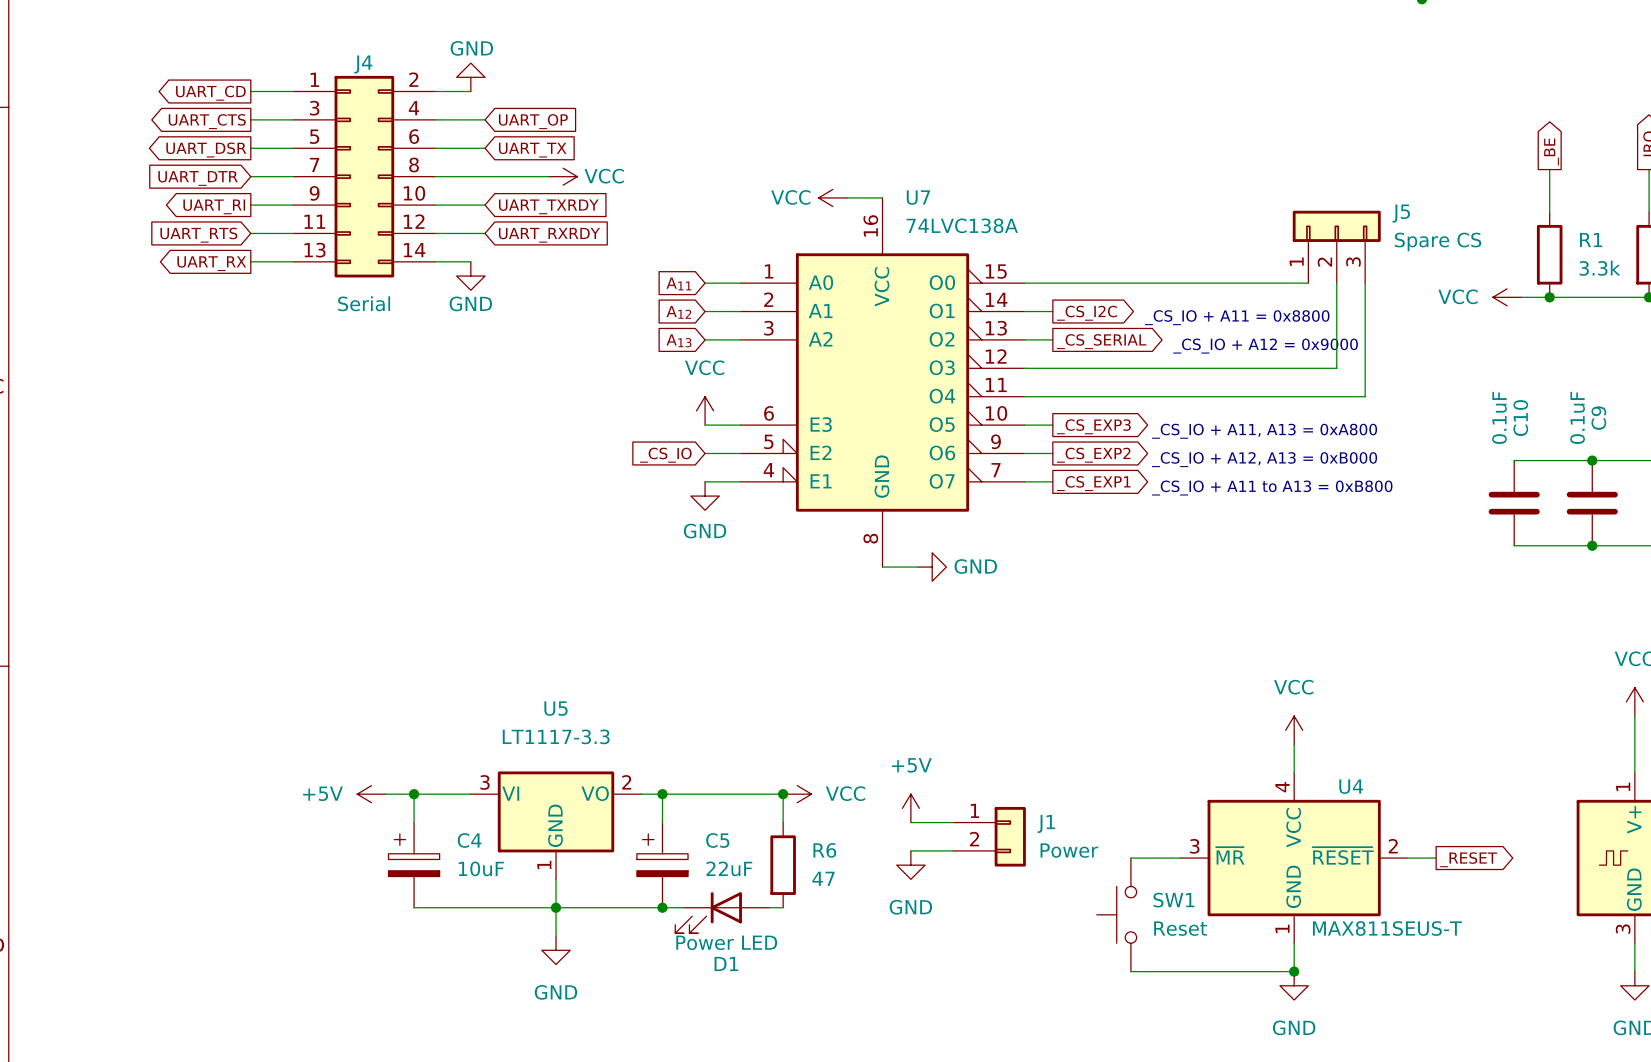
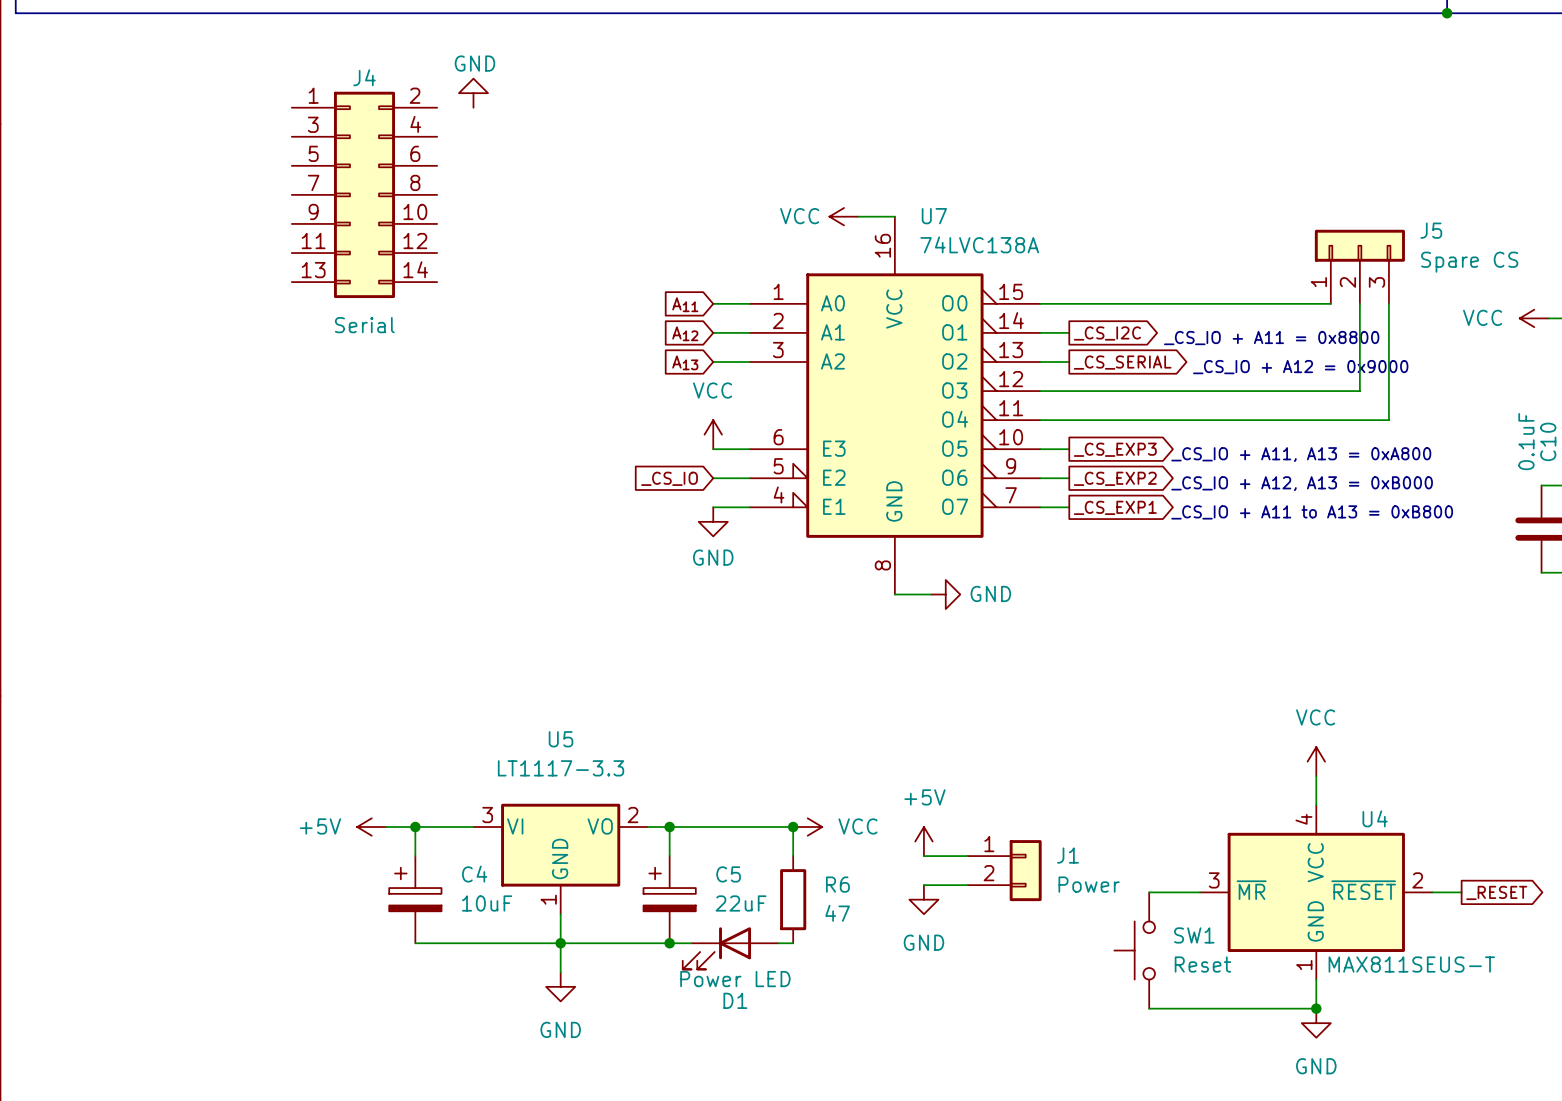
wire: (250, 91) (293, 91) -> none
wire: (435, 91) (470, 91) -> none
global label: UART_CD (210, 93) -> none
wire: (250, 119) (293, 119) -> none
wire: (435, 119) (485, 119) -> none
global label: UART_CTS (207, 121) -> none
global label: UART_OP (533, 121) -> none
wire: (250, 148) (293, 148) -> none
wire: (435, 148) (485, 148) -> none
global label: UART_DSR (206, 149) -> none
global label: UART_TX (532, 150) -> none
wire: (250, 176) (293, 176) -> none
wire: (435, 176) (548, 176) -> none
power symbol: VCC (563, 176) -> none
global label: UART_DTR (198, 178) -> none
wire: (250, 205) (293, 205) -> none
wire: (435, 205) (485, 205) -> none
global label: UART_RI (214, 206) -> none
global label: UART_TXRDY (548, 206) -> none
wire: (250, 233) (293, 233) -> none
wire: (435, 233) (485, 233) -> none
global label: UART_RTS (198, 235) -> none
global label: UART_RXRDY (549, 235) -> none
wire: (250, 261) (293, 261) -> none
wire: (435, 261) (470, 261) -> none
global label: UART_RX (211, 263) -> none
power symbol: GND (470, 276) -> none

